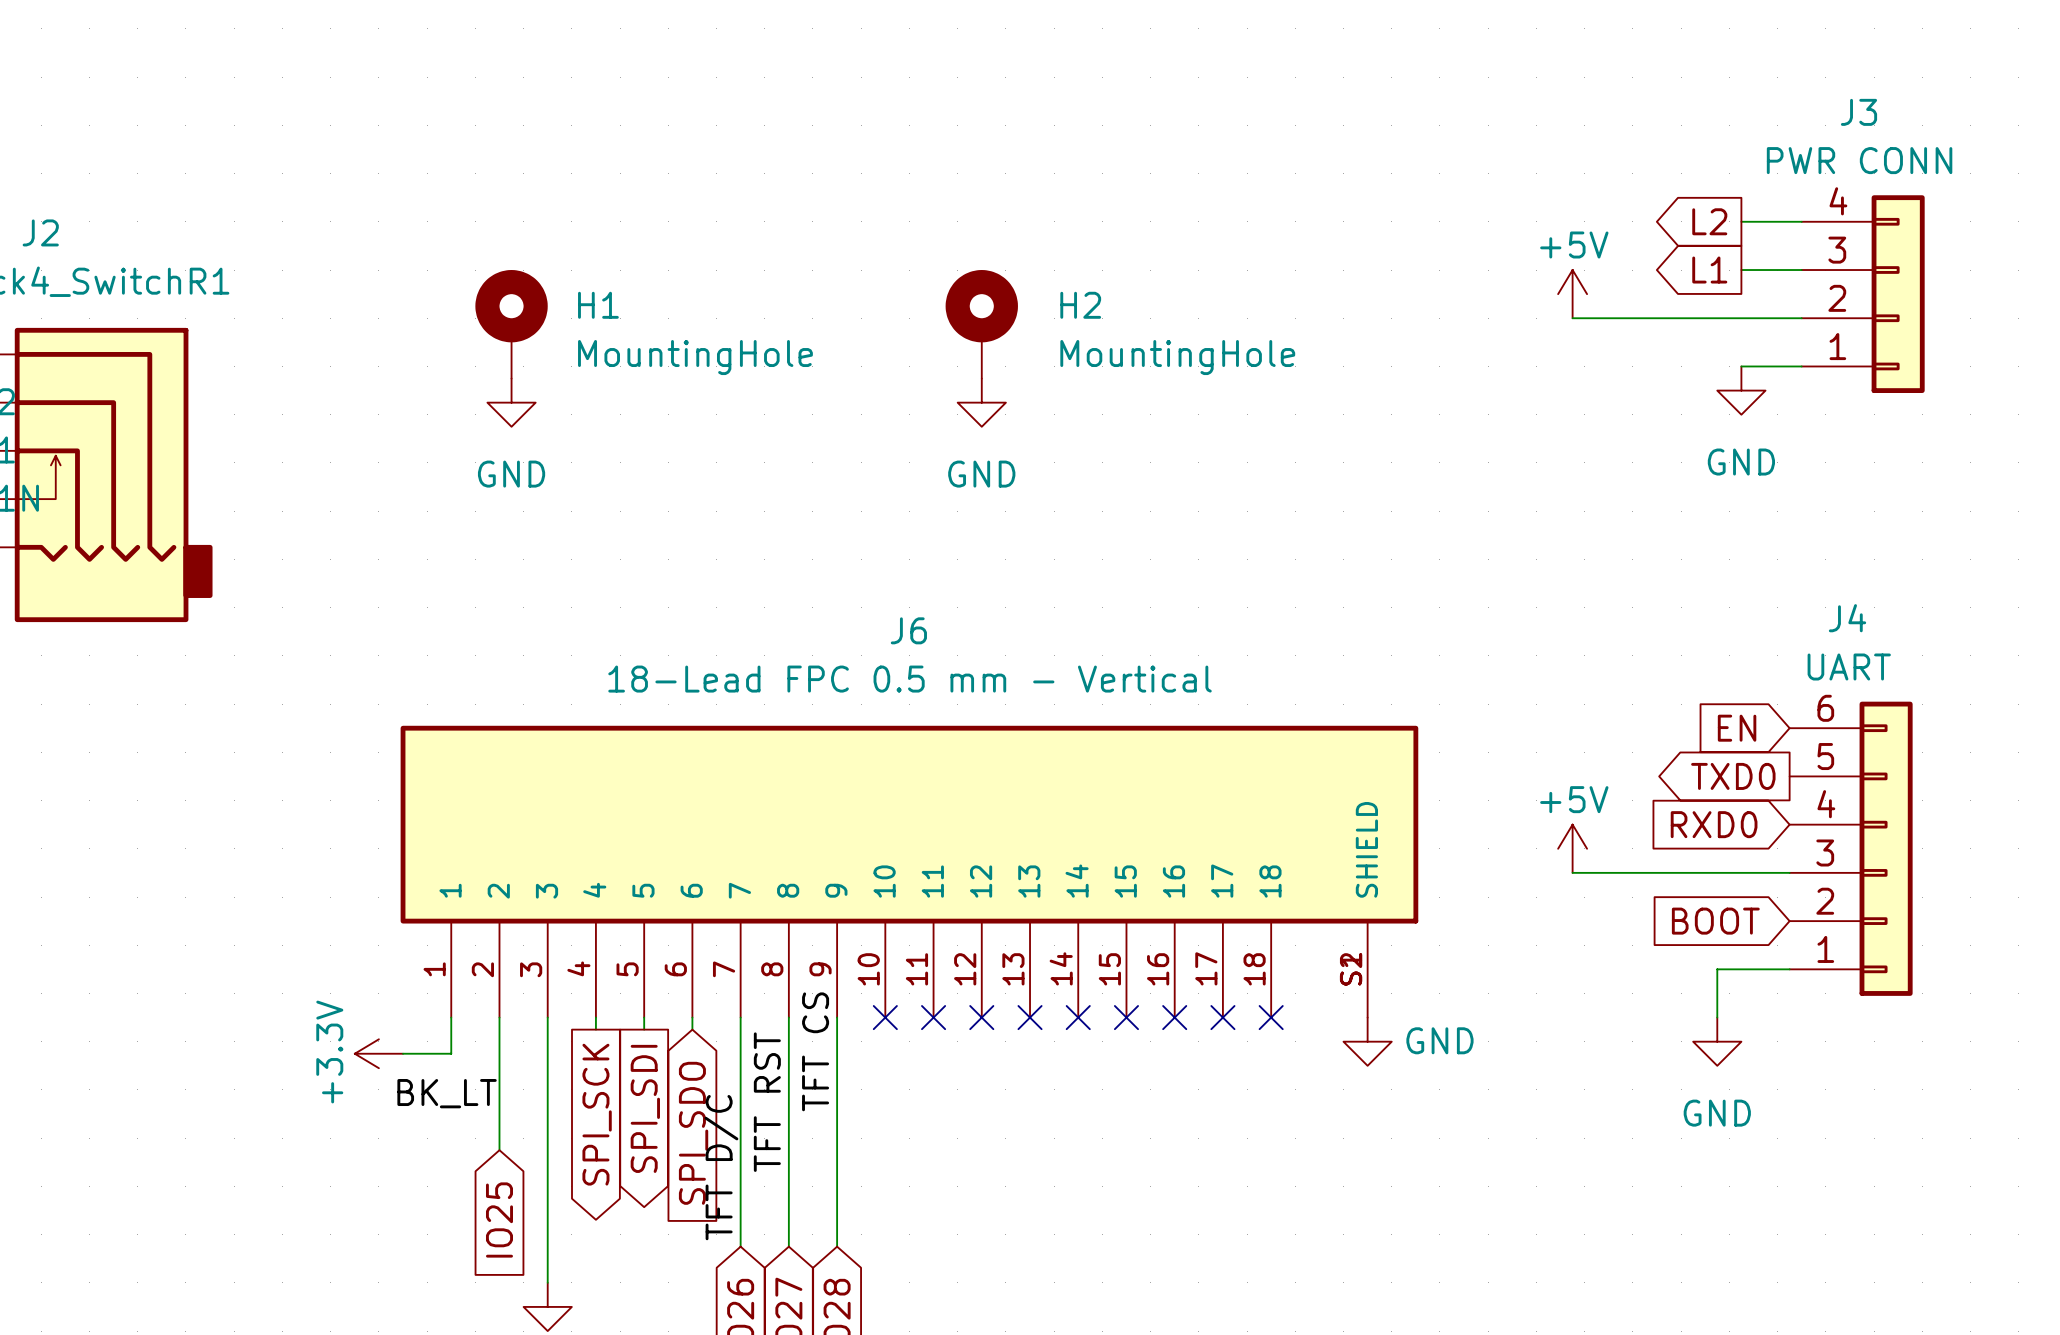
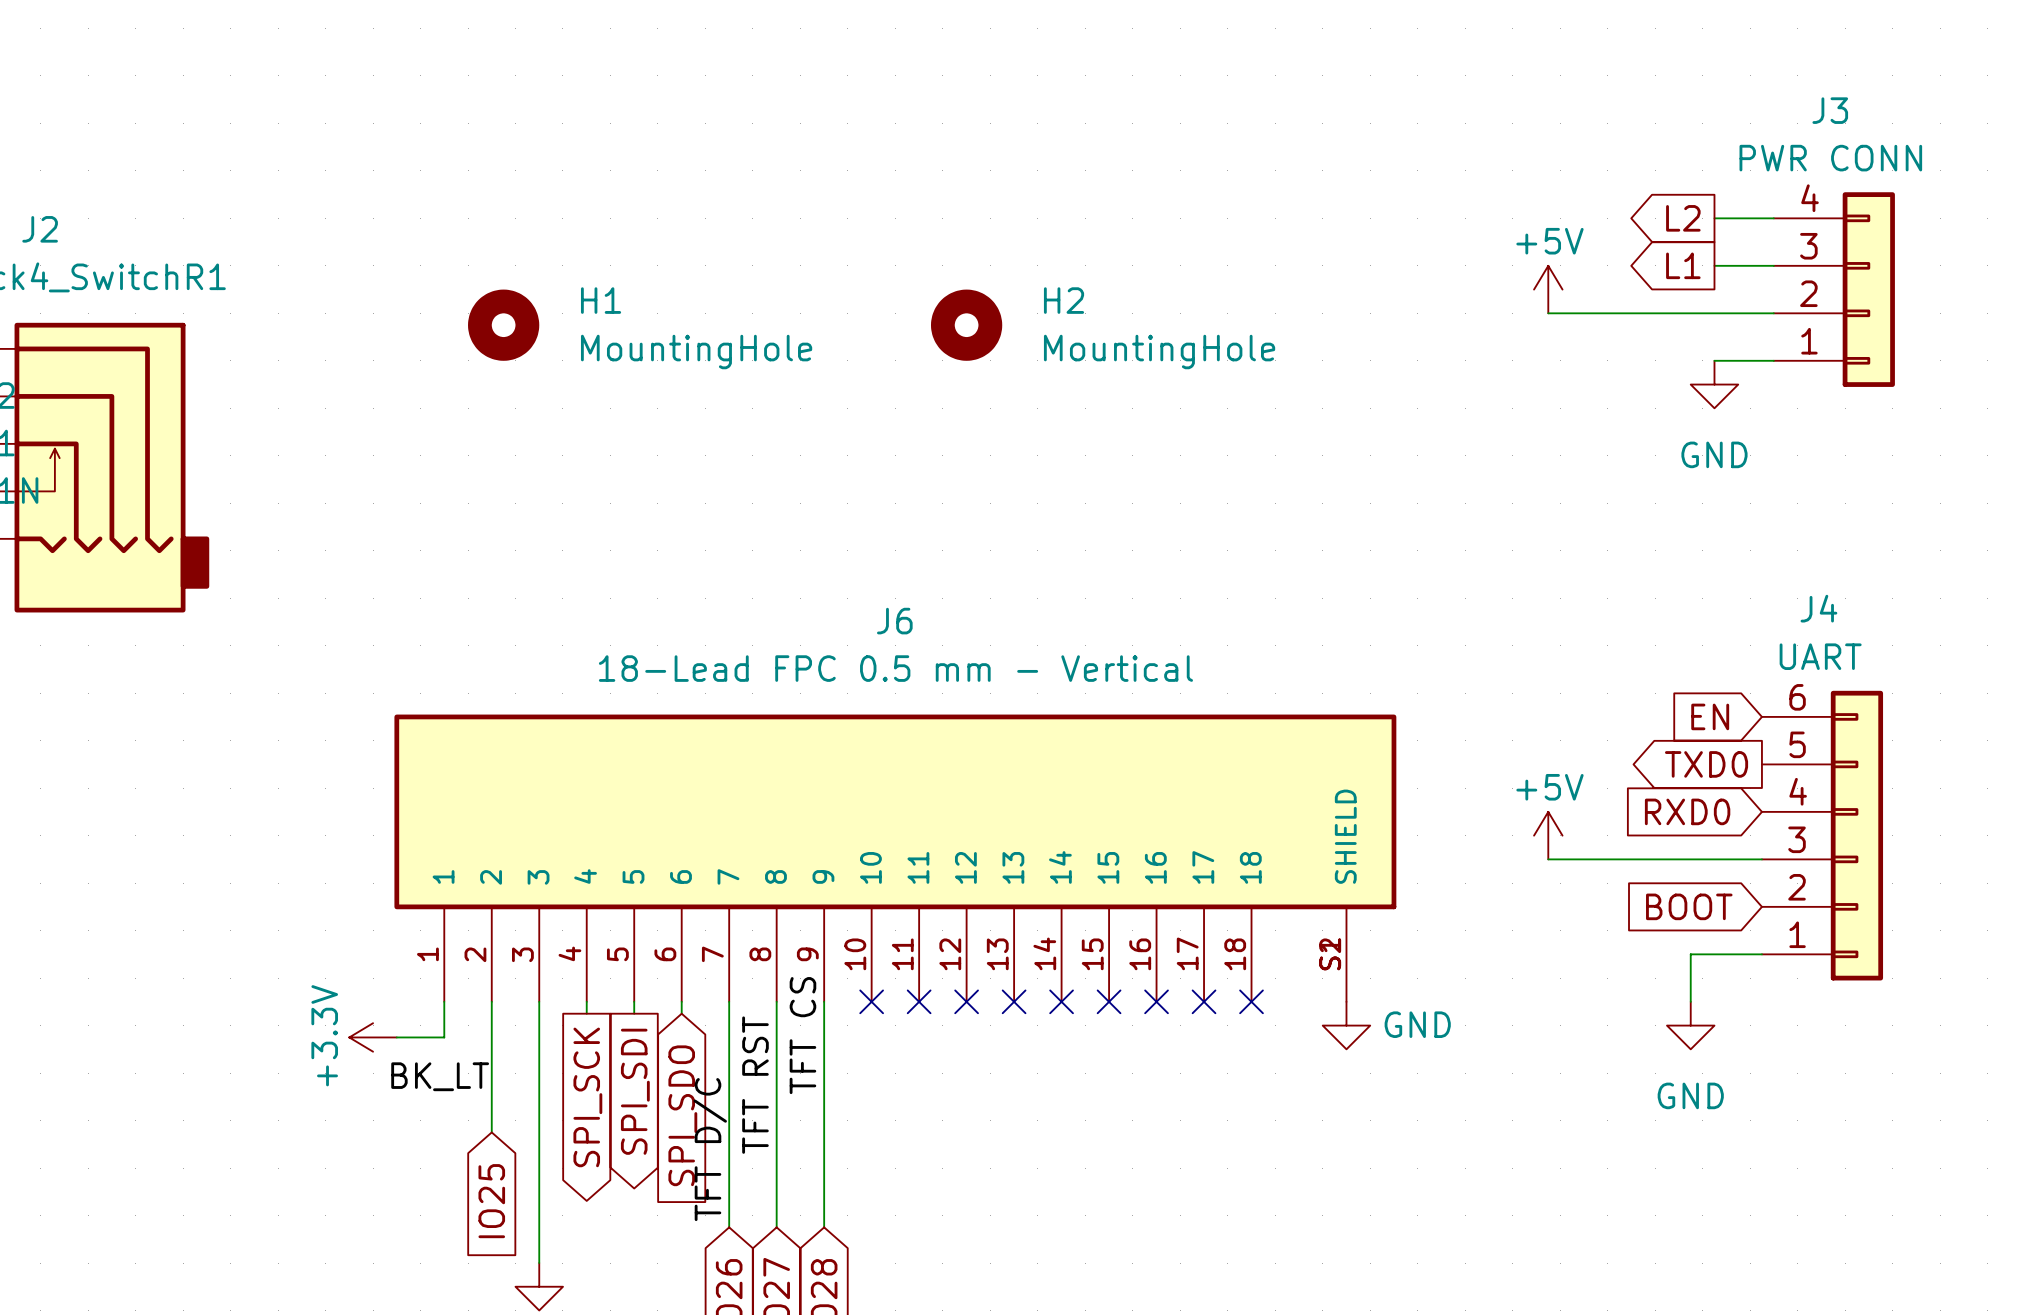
H1 symbol: [475, 270, 548, 379] -> [468, 289, 540, 361]
H2 symbol: [945, 270, 1018, 379] -> [930, 289, 1003, 361]
power symbol: GND (511, 402) -> none
power symbol: GND (981, 402) -> none

